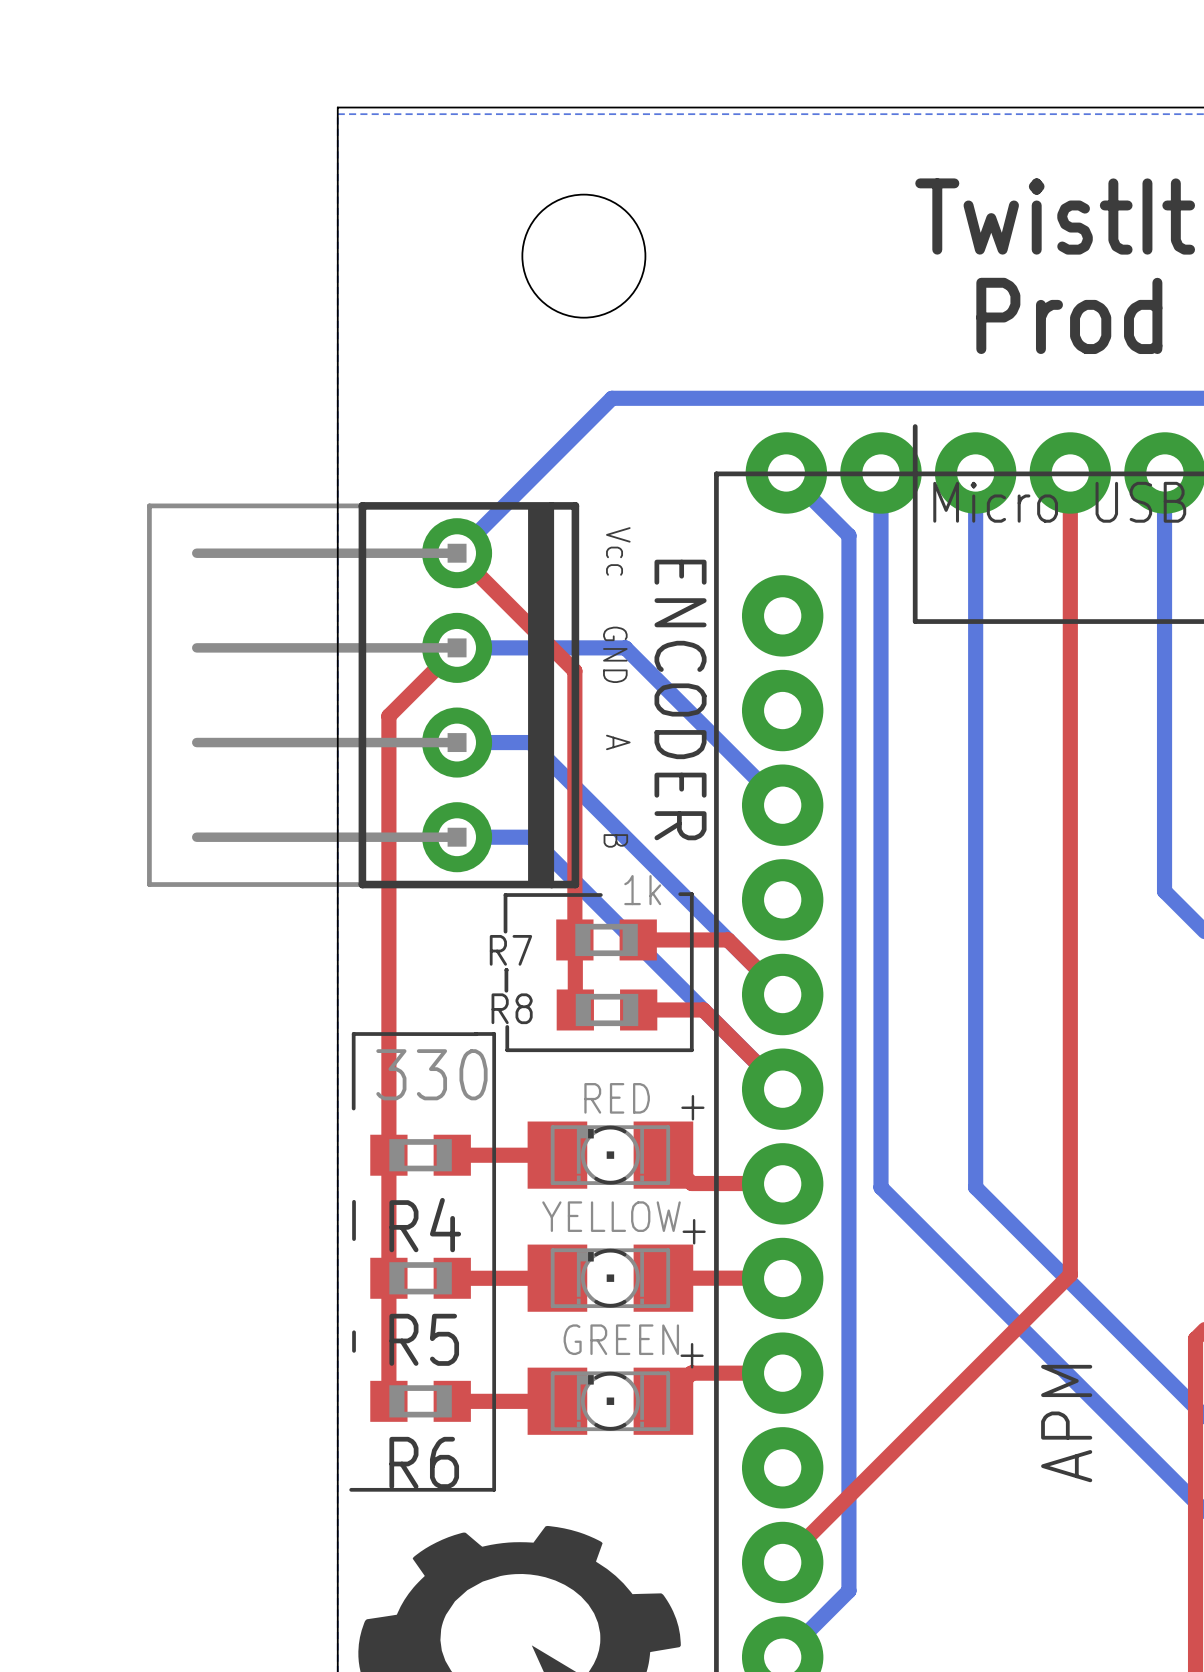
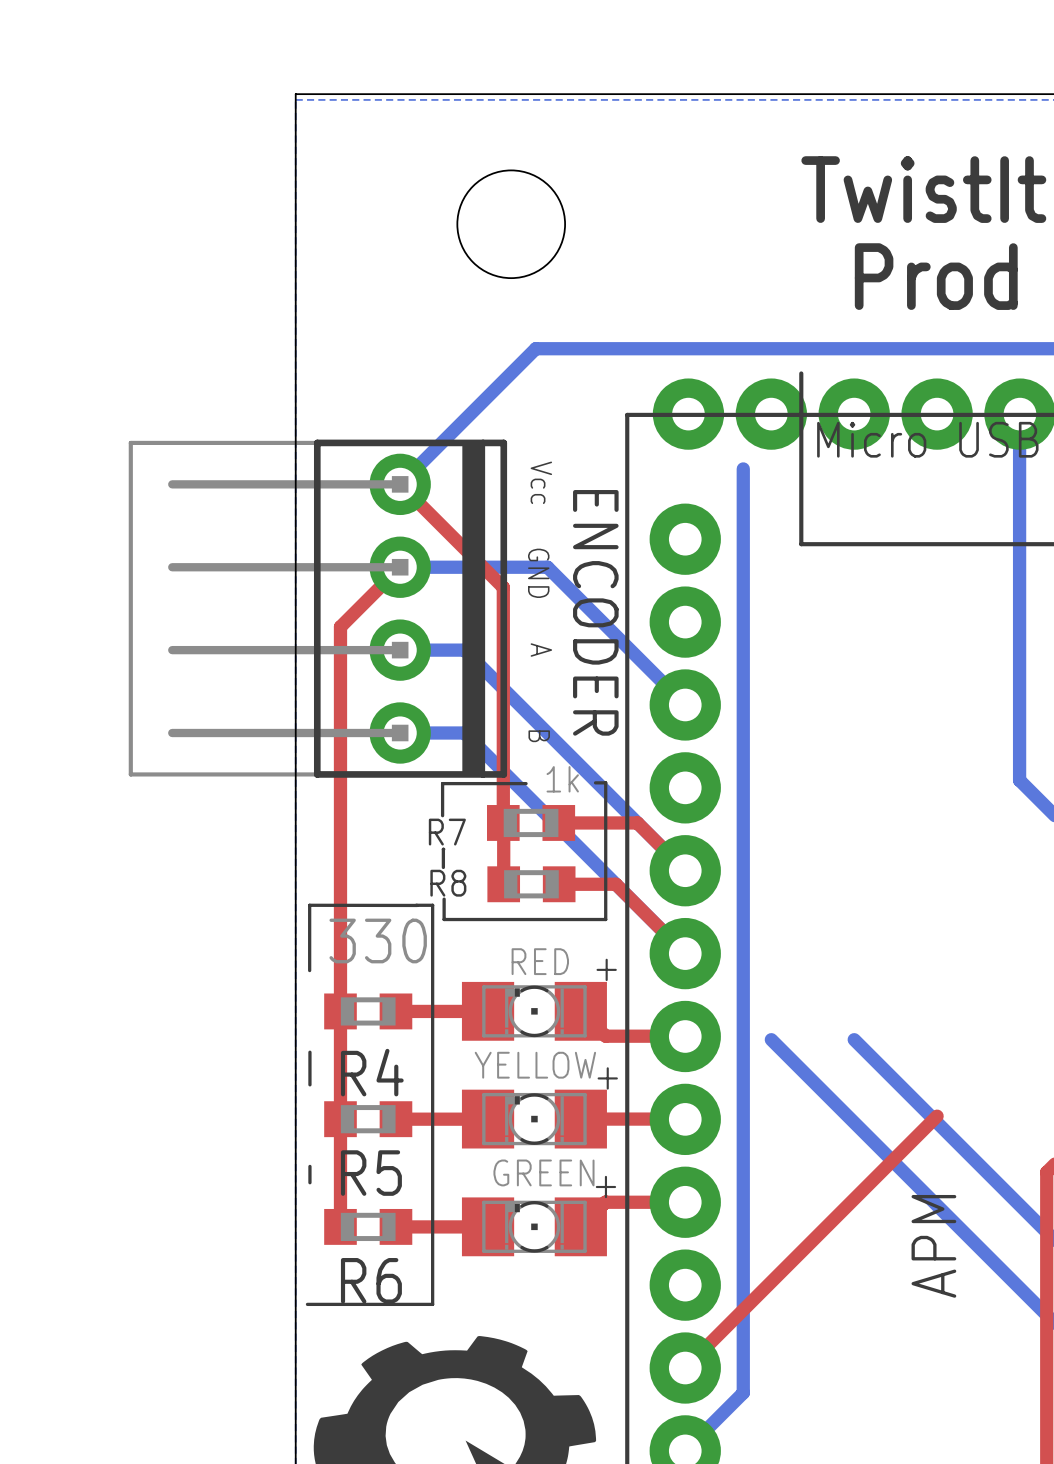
bottom track: (786, 472) (848, 535) -> none
bottom track: (880, 472) (880, 1187) -> none
bottom track: (975, 472) (975, 1187) -> none
top track: (1070, 472) (1070, 1274) -> none

